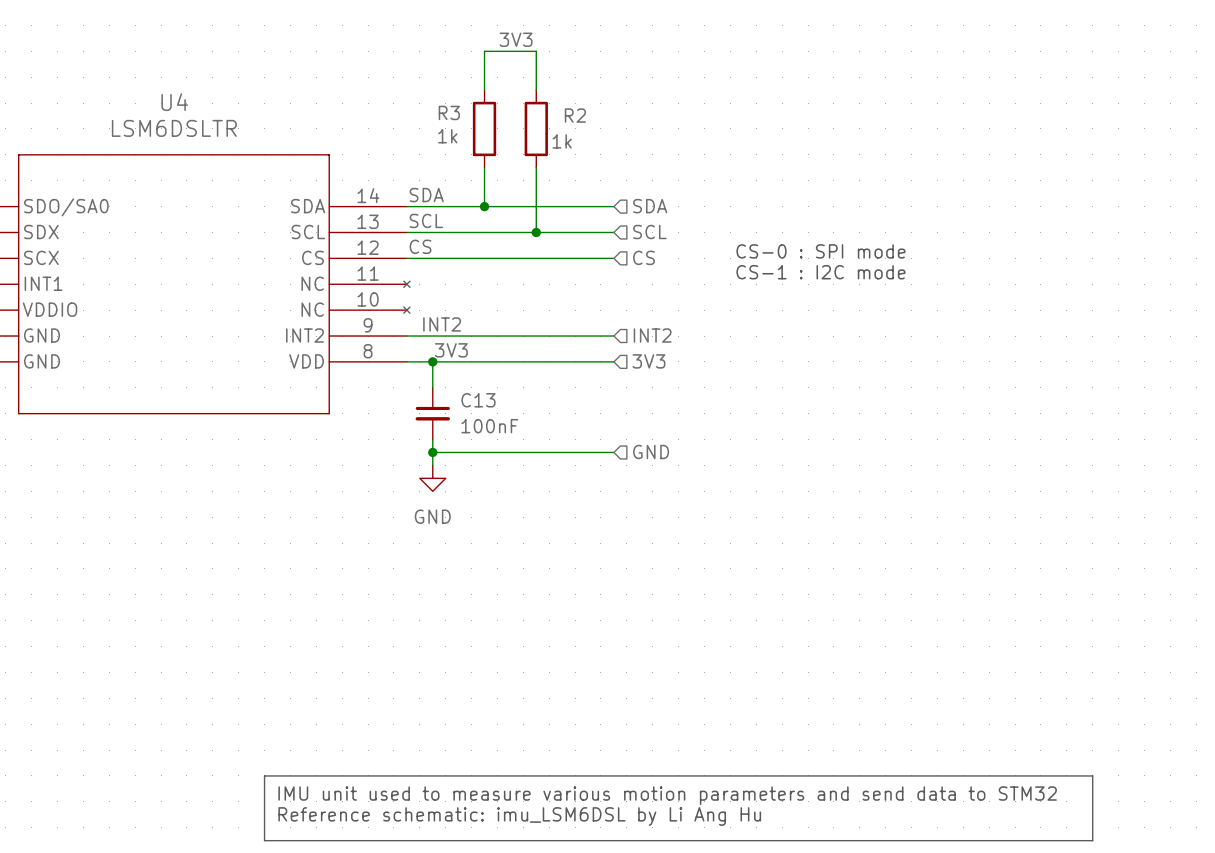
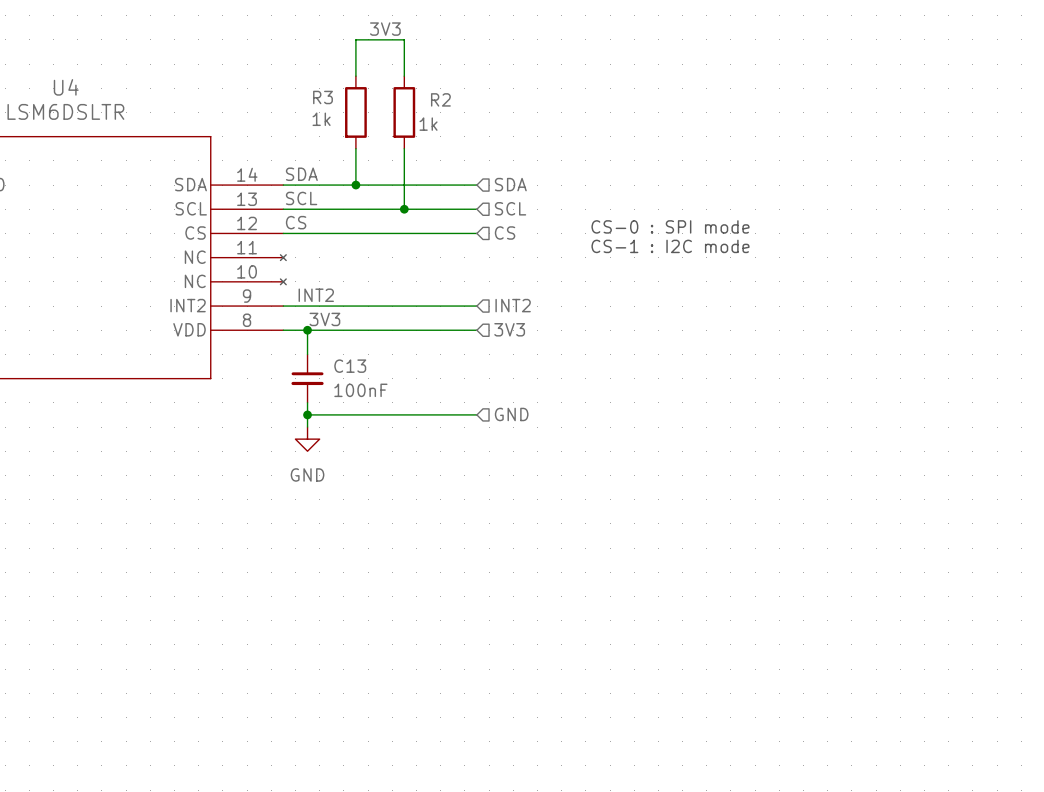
line: (264, 775) (1092, 775) (1092, 840) (264, 840) (264, 775) -> none
text: IMU unit used to measure various motion parameters and send data to STM32 (667, 795) -> none
text: Reference schematic: imu_LSM6DSL by Li Ang Hu (519, 816) -> none

